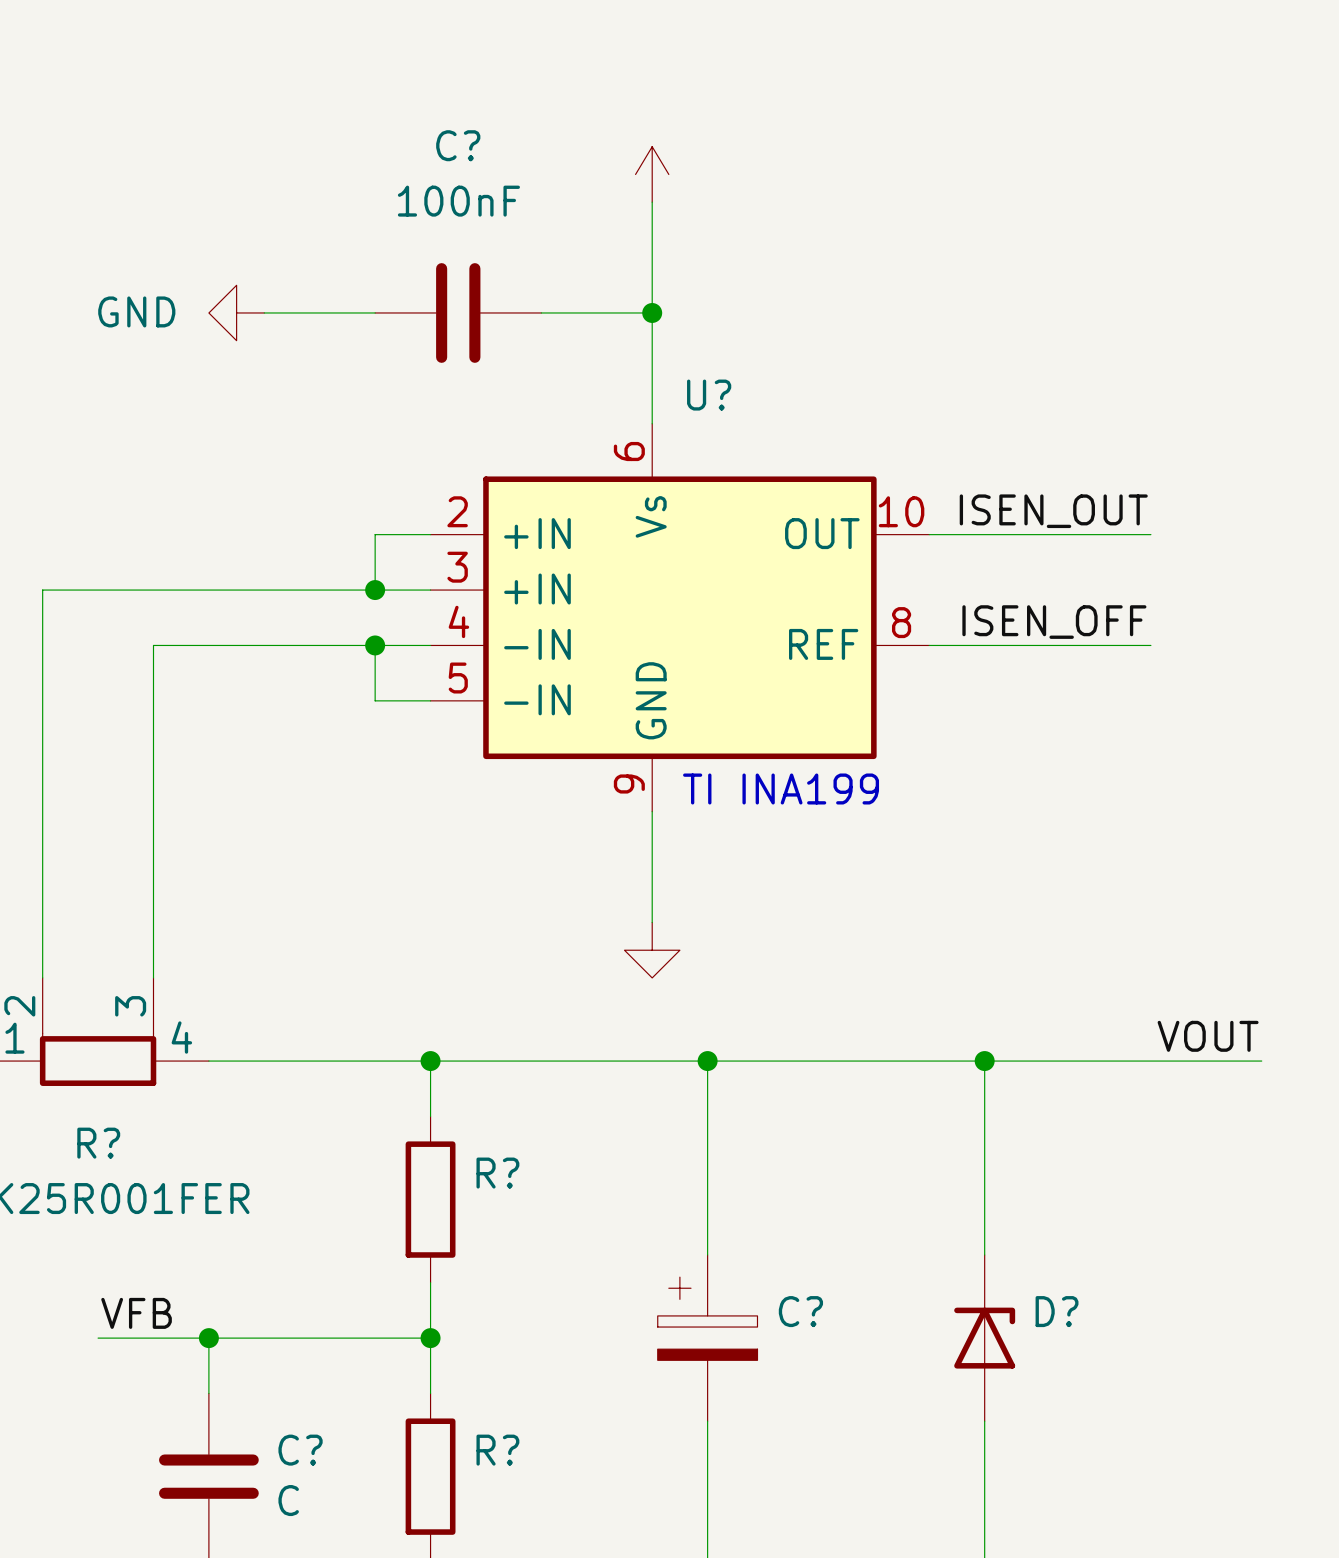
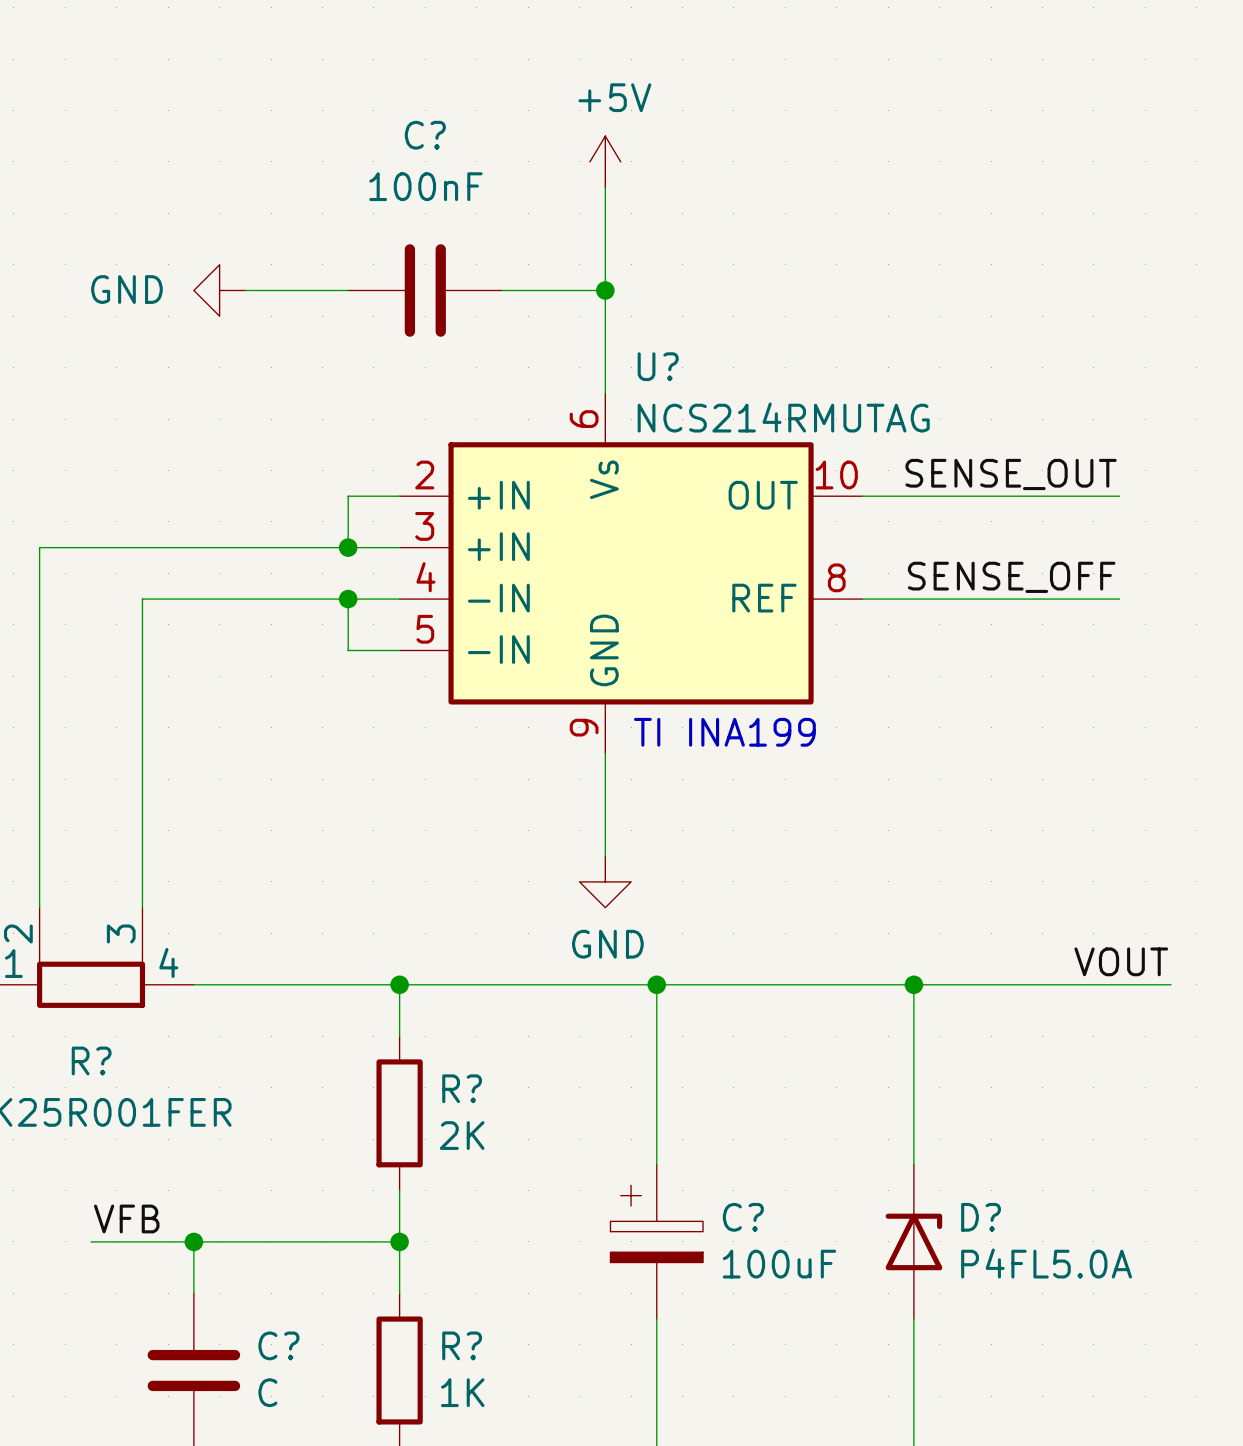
power symbol text: none -> +5V (614, 97)
U? value: none -> NCS214RMUTAG (783, 417)
label: ISEN_OUT (1053, 511) -> SENSE_OUT (1011, 474)
wire: none -> (1068, 496) (1119, 496)
label: ISEN_OFF (1054, 622) -> SENSE_OFF (1011, 577)
wire: none -> (1068, 599) (1119, 599)
power symbol text: none -> GND (607, 944)
R? value: none -> 2K (462, 1135)
D? value: none -> P4FL5.0A (1046, 1263)
C? value: none -> 100uF (779, 1264)
R? value: none -> 1K (462, 1392)

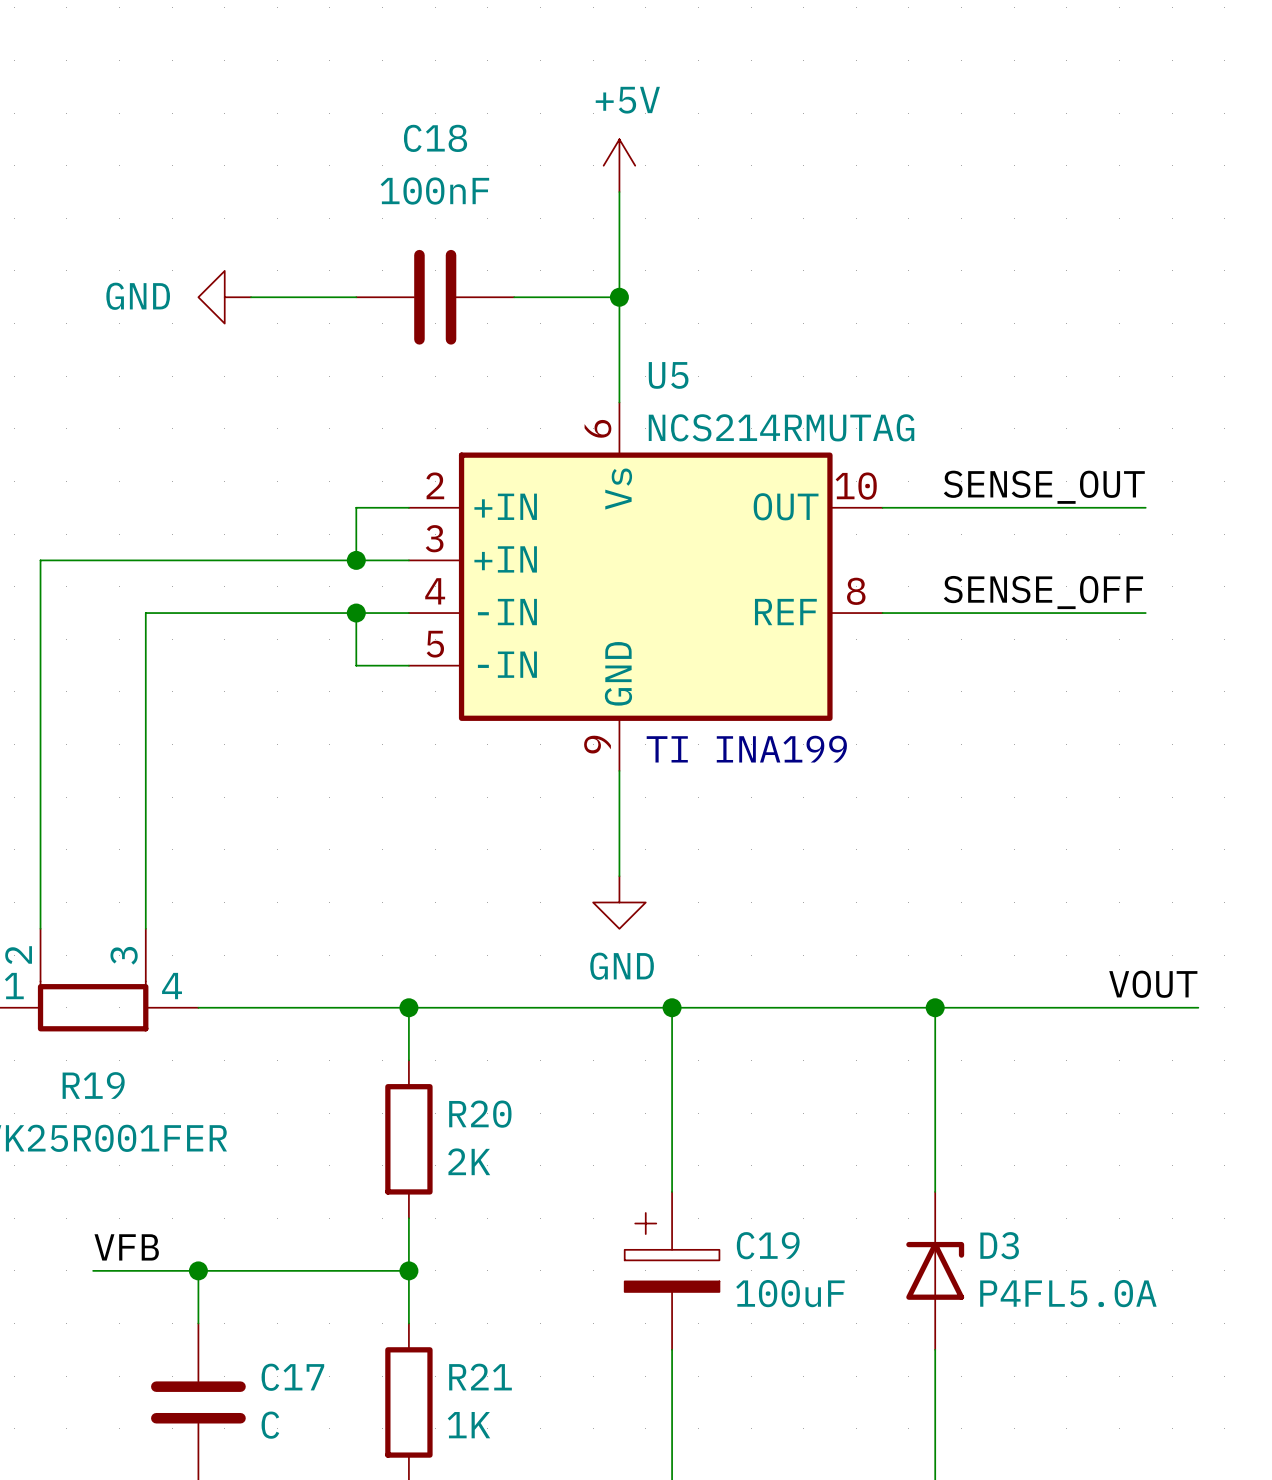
C? name: C? (425, 135) -> C18 (435, 138)
U? name: U? (658, 366) -> U5 (668, 375)
R? name: R? (91, 1060) -> R19 (93, 1085)
R? name: R? (462, 1088) -> R20 (480, 1114)
C? name: C? (743, 1217) -> C19 (768, 1245)
D? name: D? (981, 1217) -> D3 (999, 1245)
C? name: C? (278, 1345) -> C17 (292, 1377)
R? name: R? (462, 1345) -> R21 (480, 1377)

